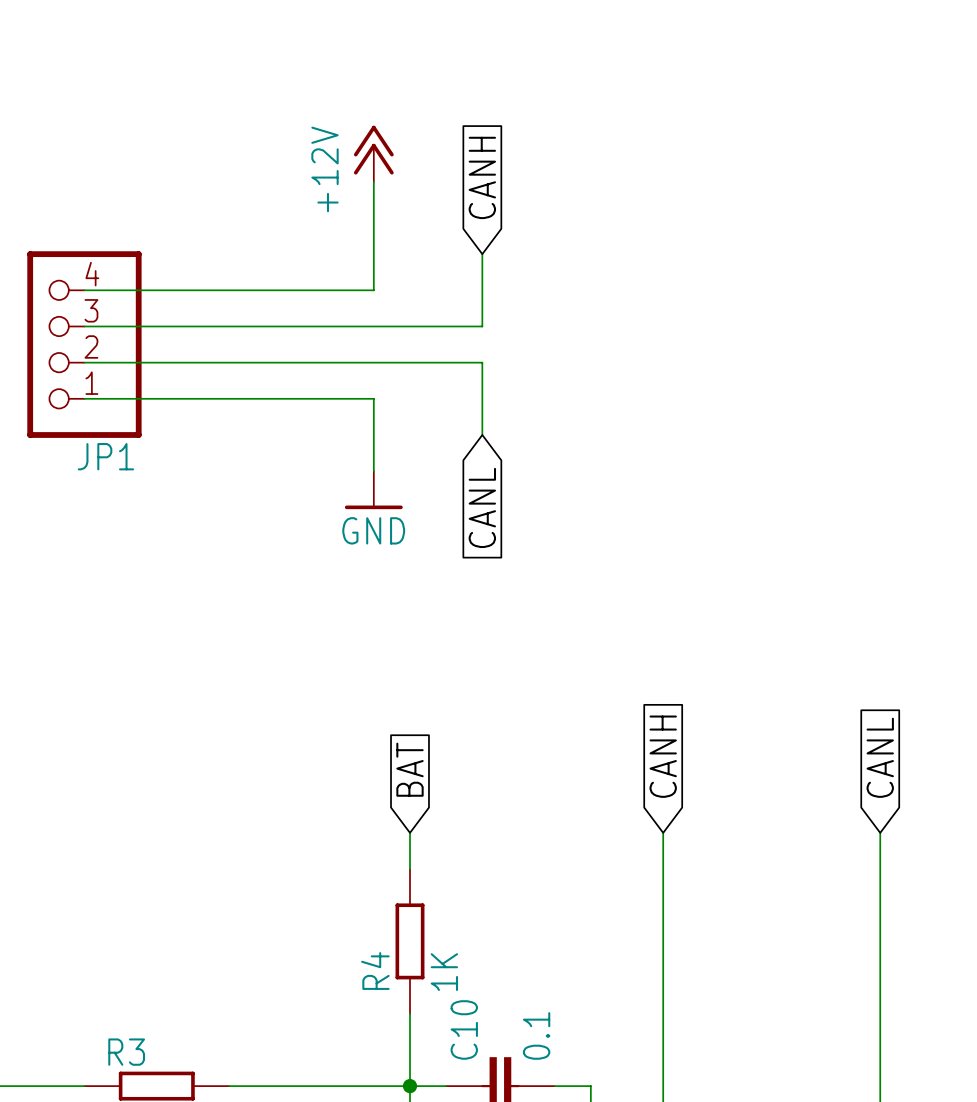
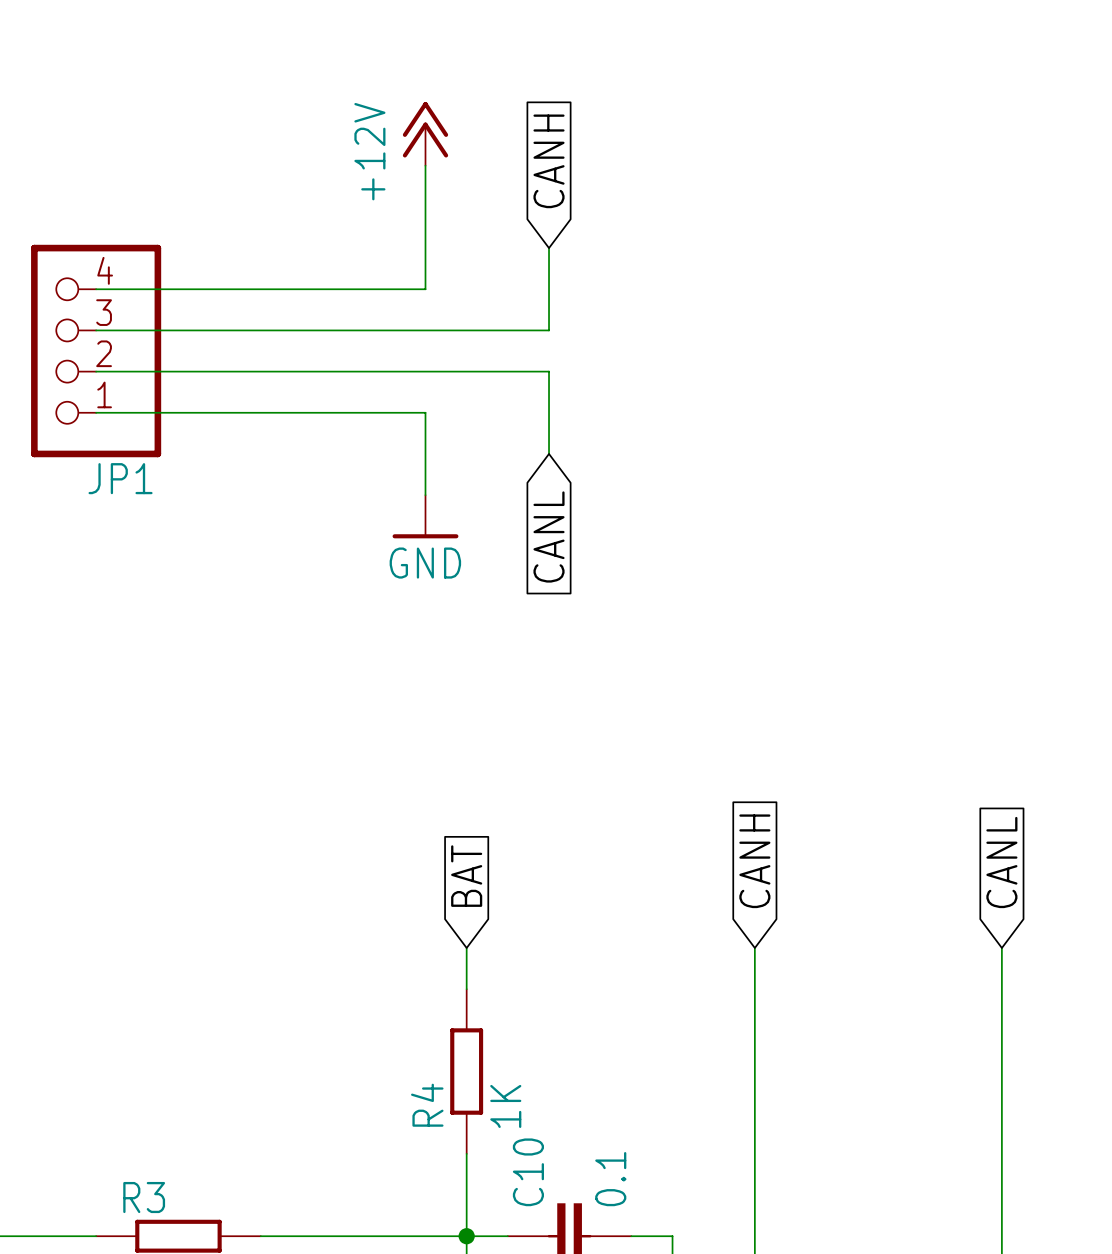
power symbol position: +12V (373, 153) -> +12V (425, 133)
global label position: CANH (482, 177) -> CANH (549, 161)
wire: (373, 254) (373, 290) -> (549, 330) (425, 330)
wire: (482, 290) (482, 326) -> (549, 412) (549, 371)
JP1 position: (84, 344) -> (96, 351)
wire: (373, 362) (482, 362) -> (425, 412) (425, 453)
wire: (84, 398) (373, 398) -> (96, 289) (425, 289)
wire: (482, 398) (482, 434) -> (549, 248) (549, 289)
power symbol position: GND (373, 490) -> GND (425, 516)
global label position: CANL (482, 507) -> CANL (549, 536)

